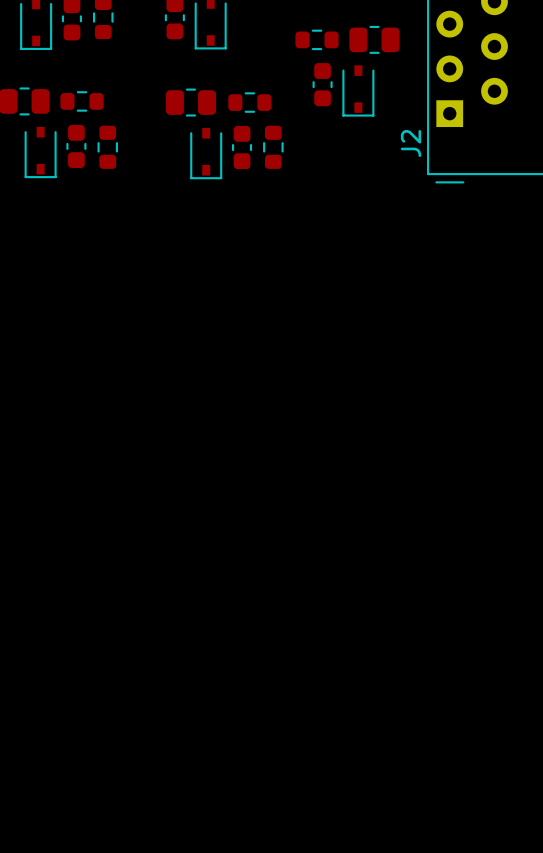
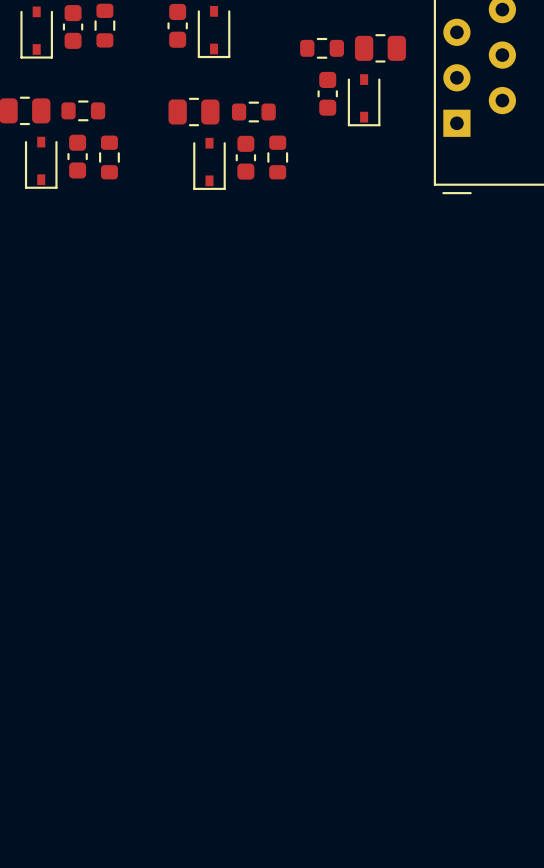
J2 name: J2 (411, 143) -> none

